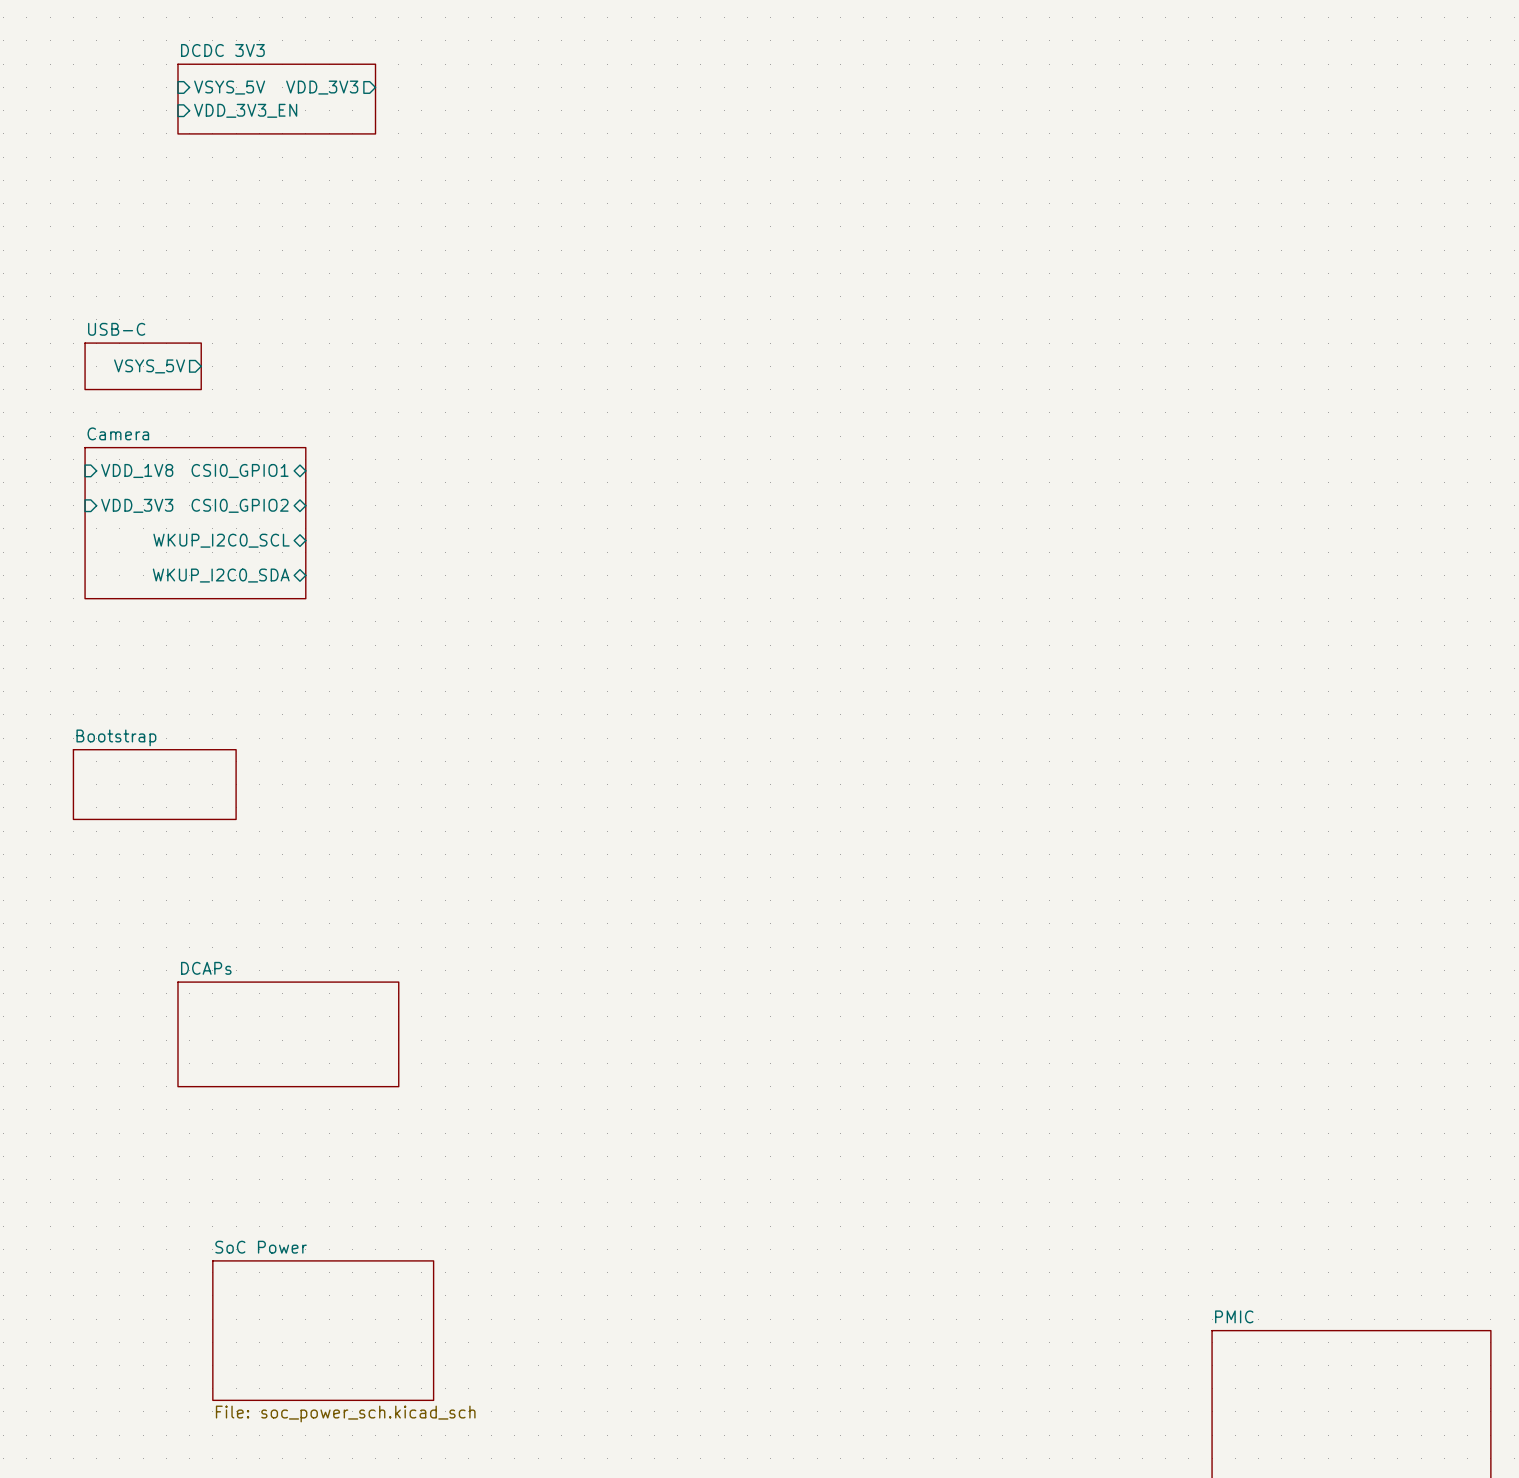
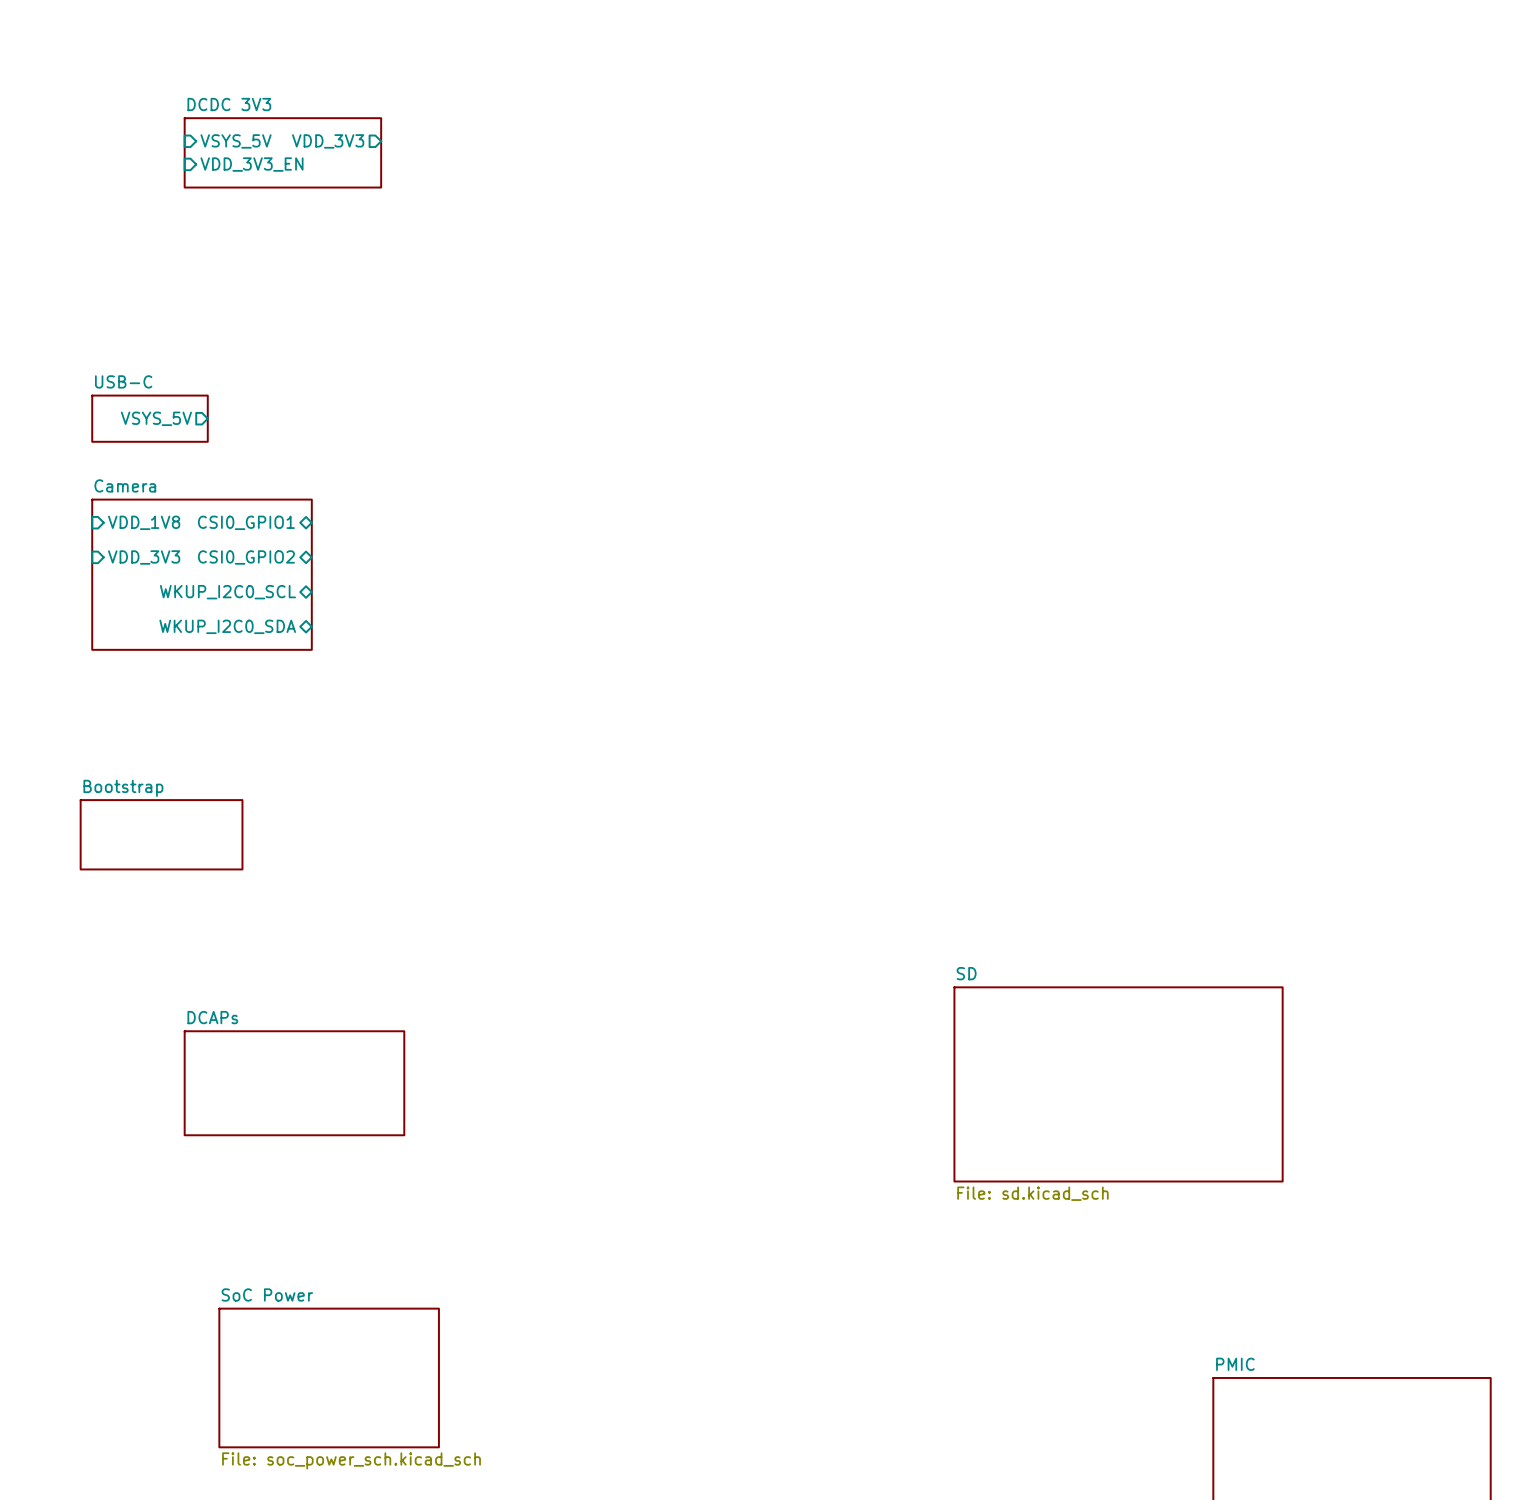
sheet SD: none -> File: sd.kicad_sch (1118, 1084)

